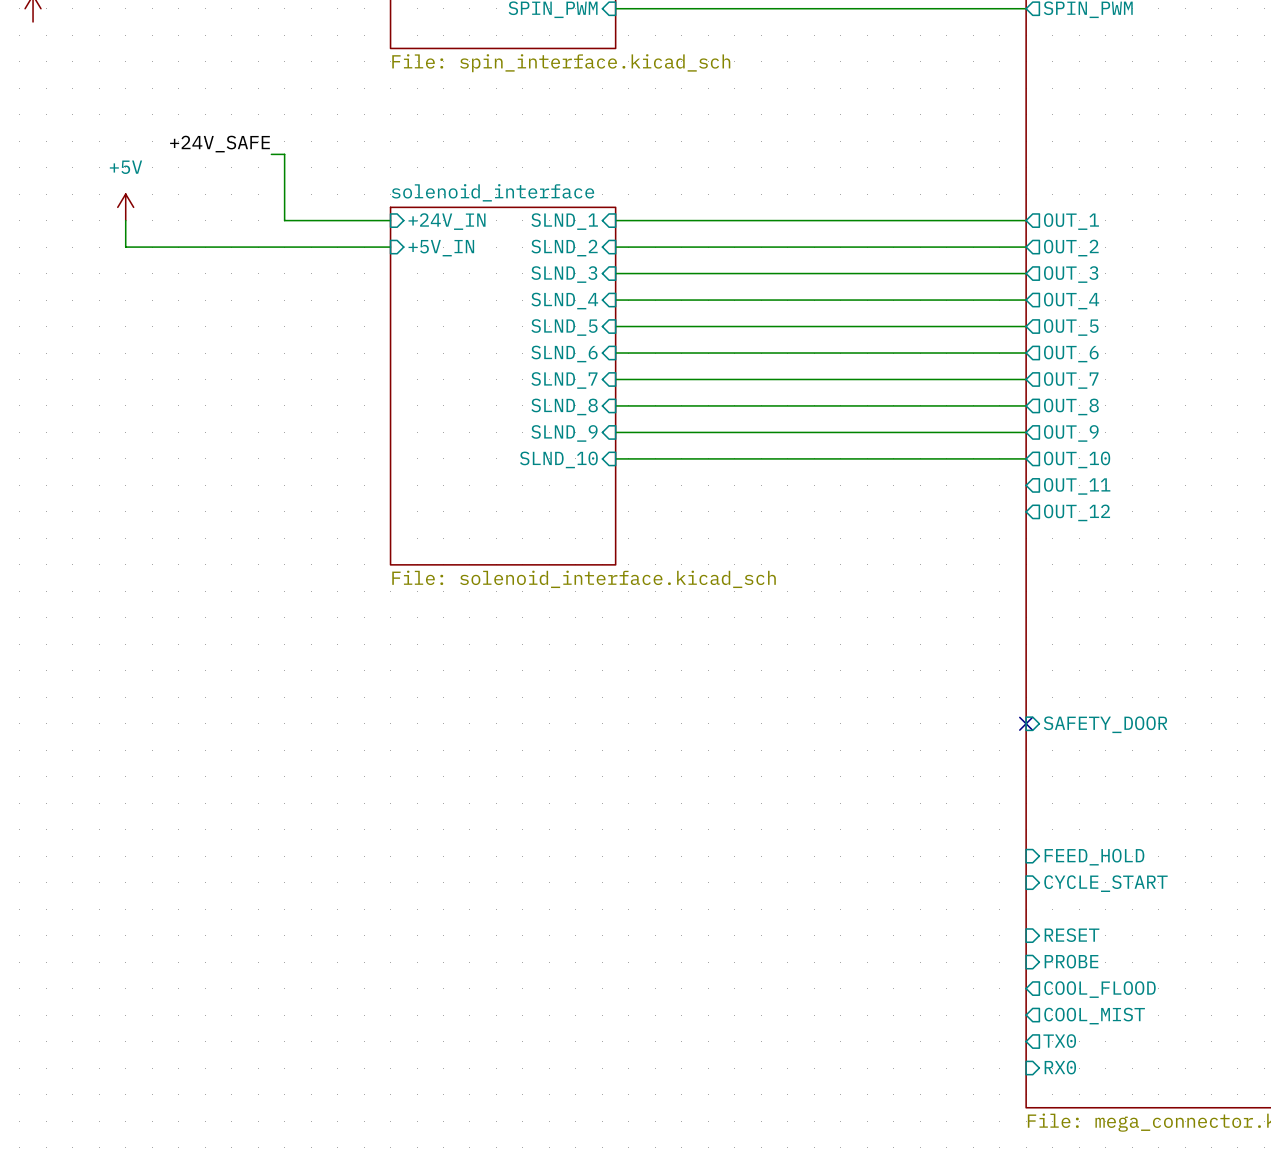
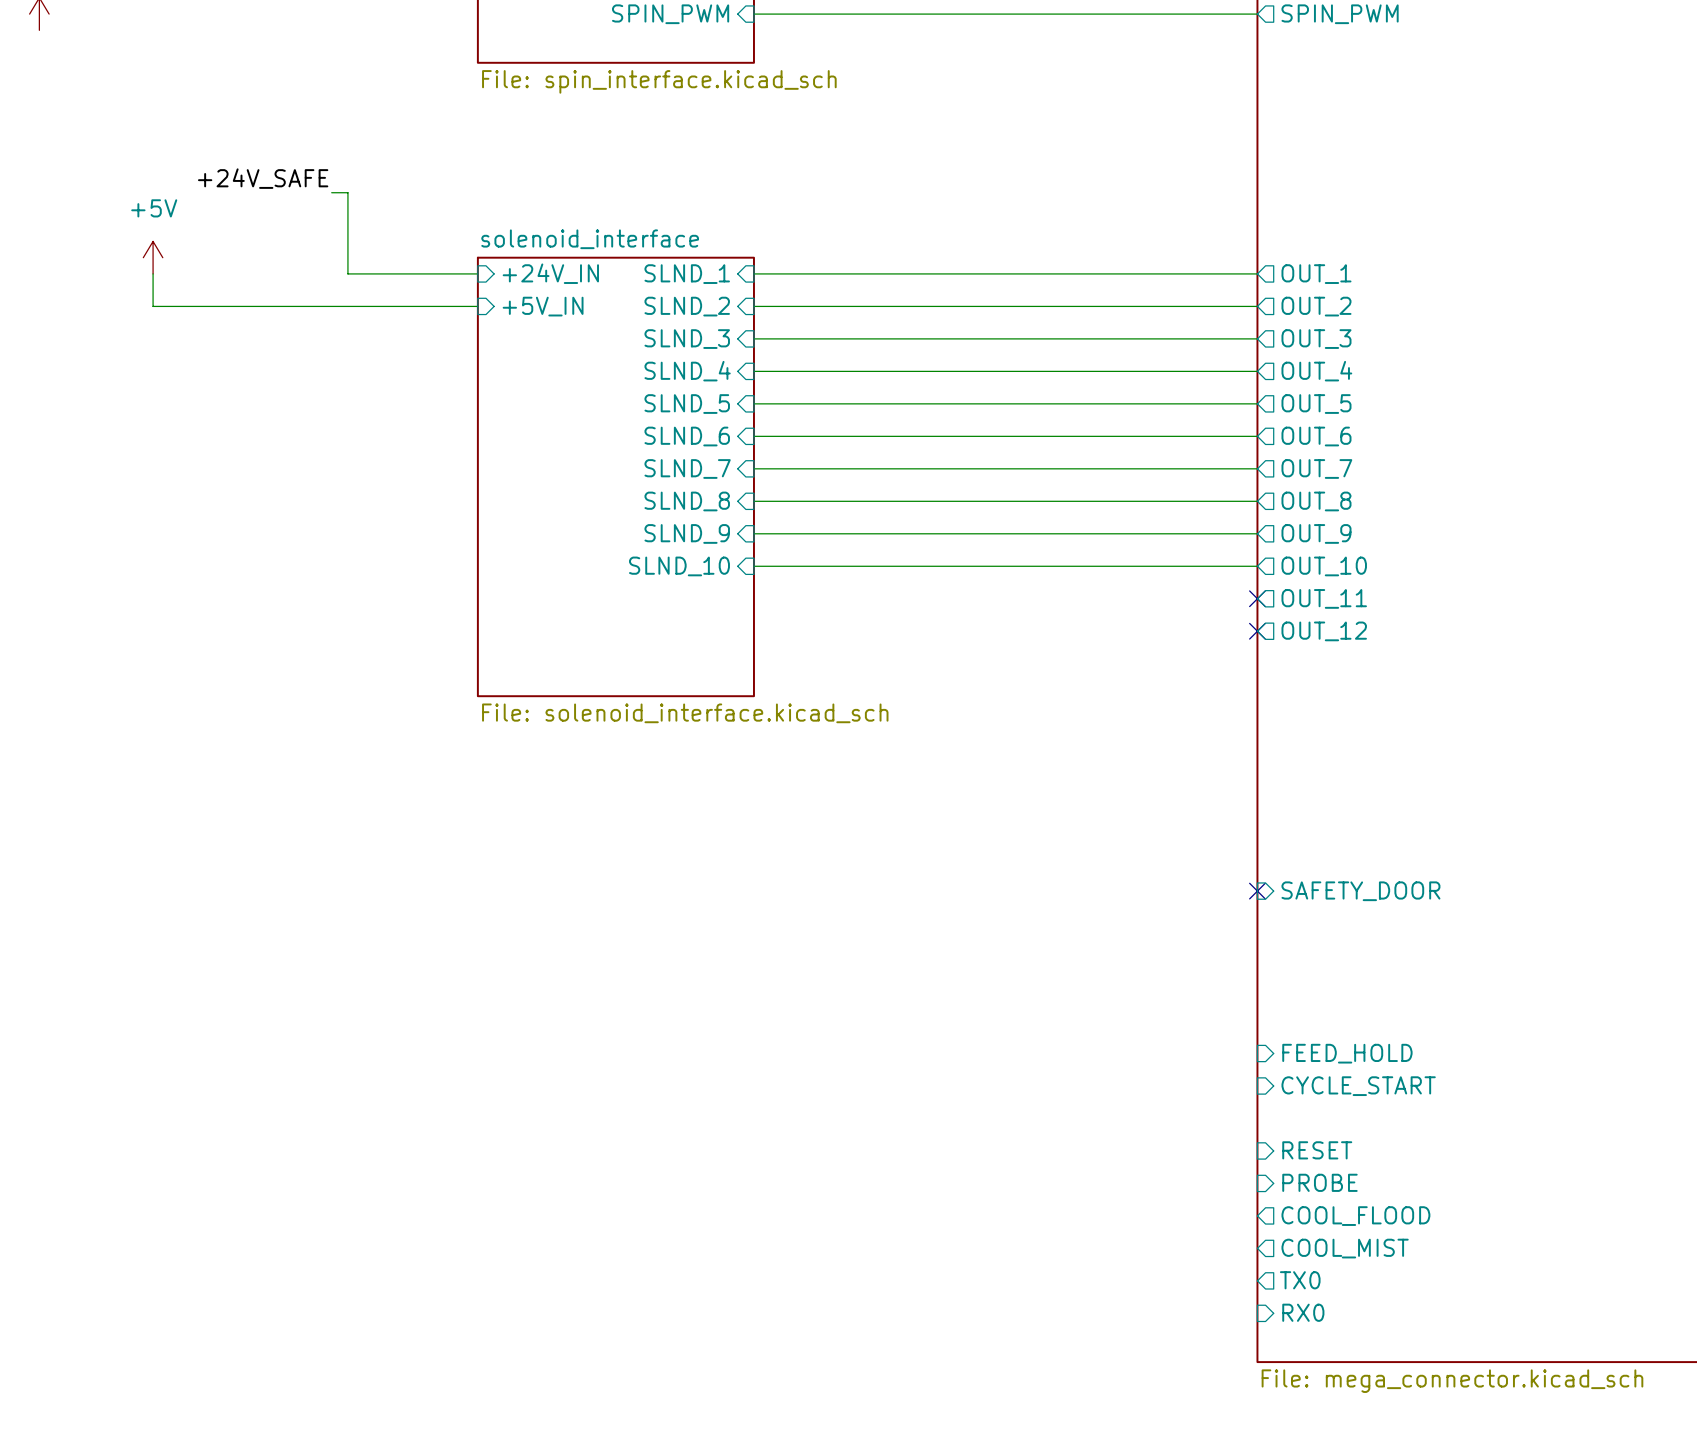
no-connect mark: none -> (1257, 598)
no-connect mark: none -> (1257, 631)

